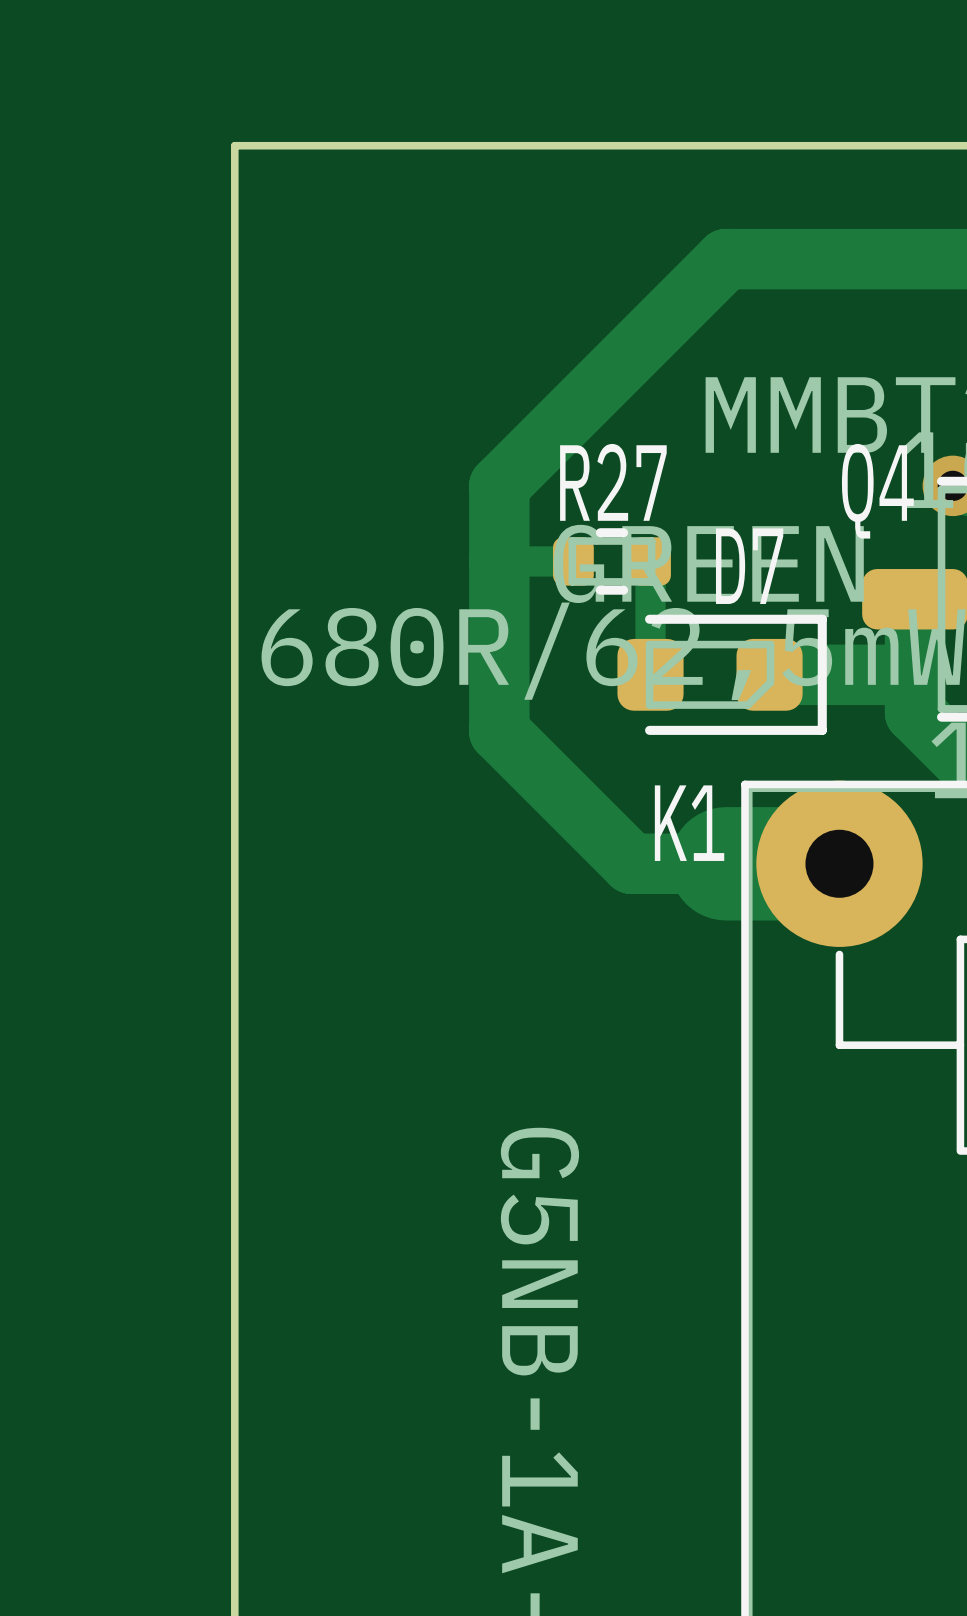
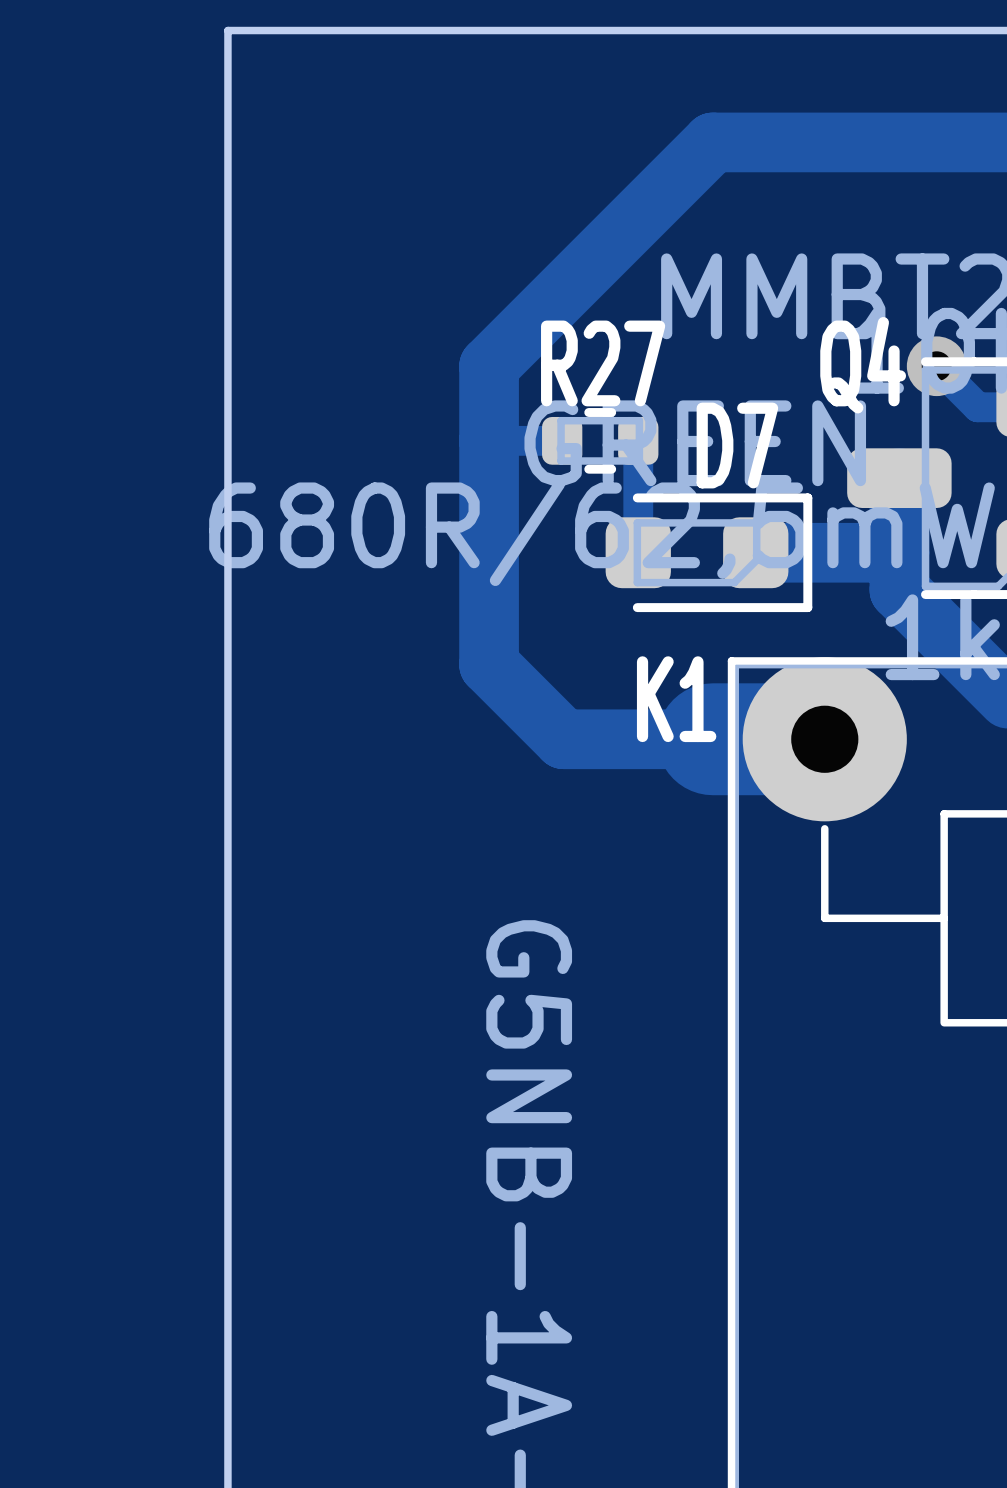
track: (499, 731) (631, 863) -> (489, 608) (489, 664) (563, 739) (619, 739)

